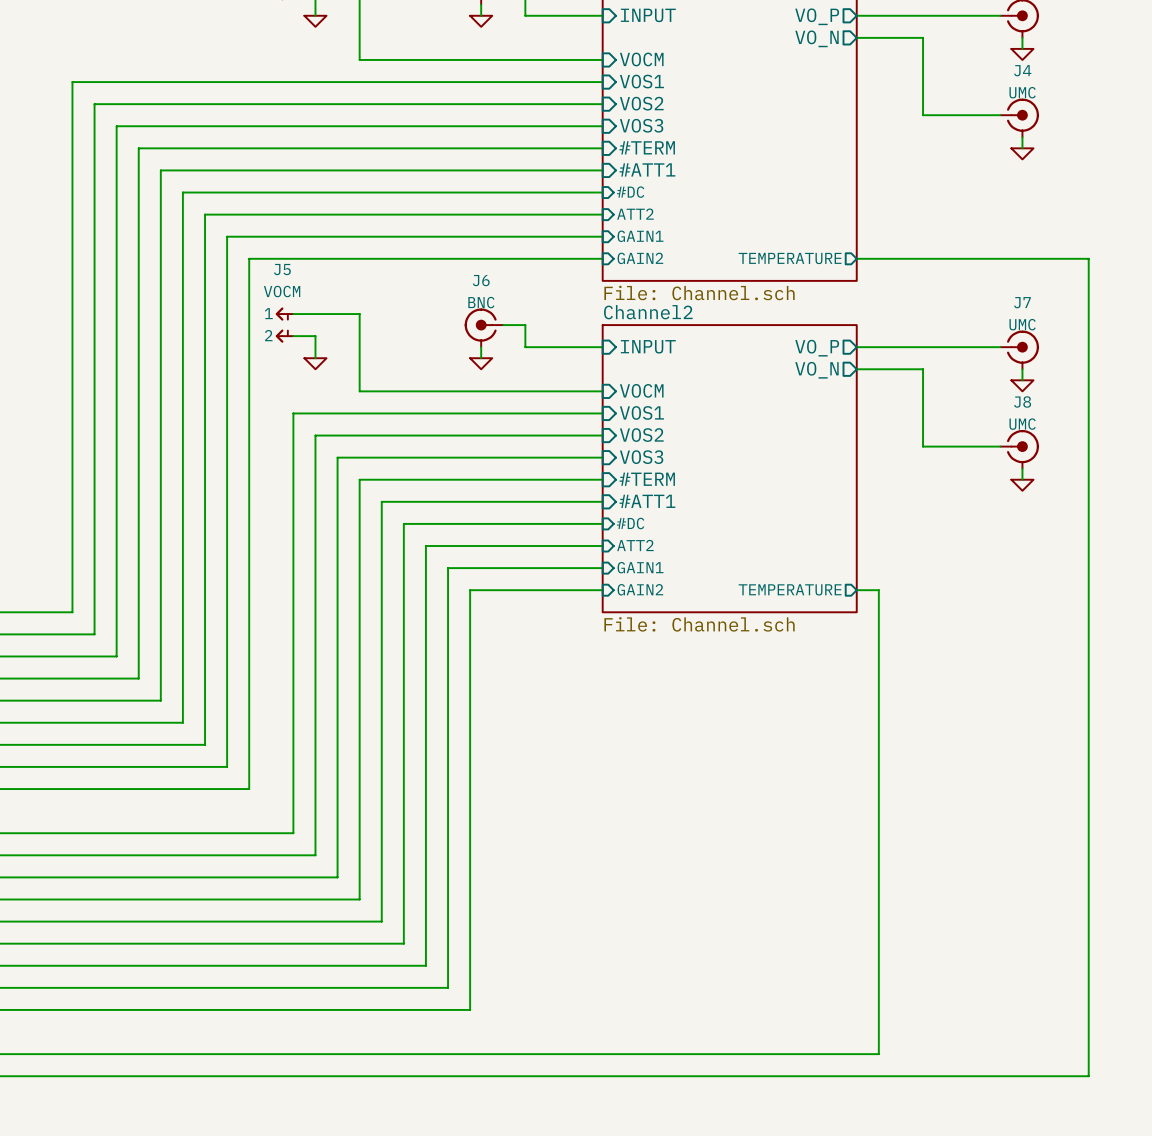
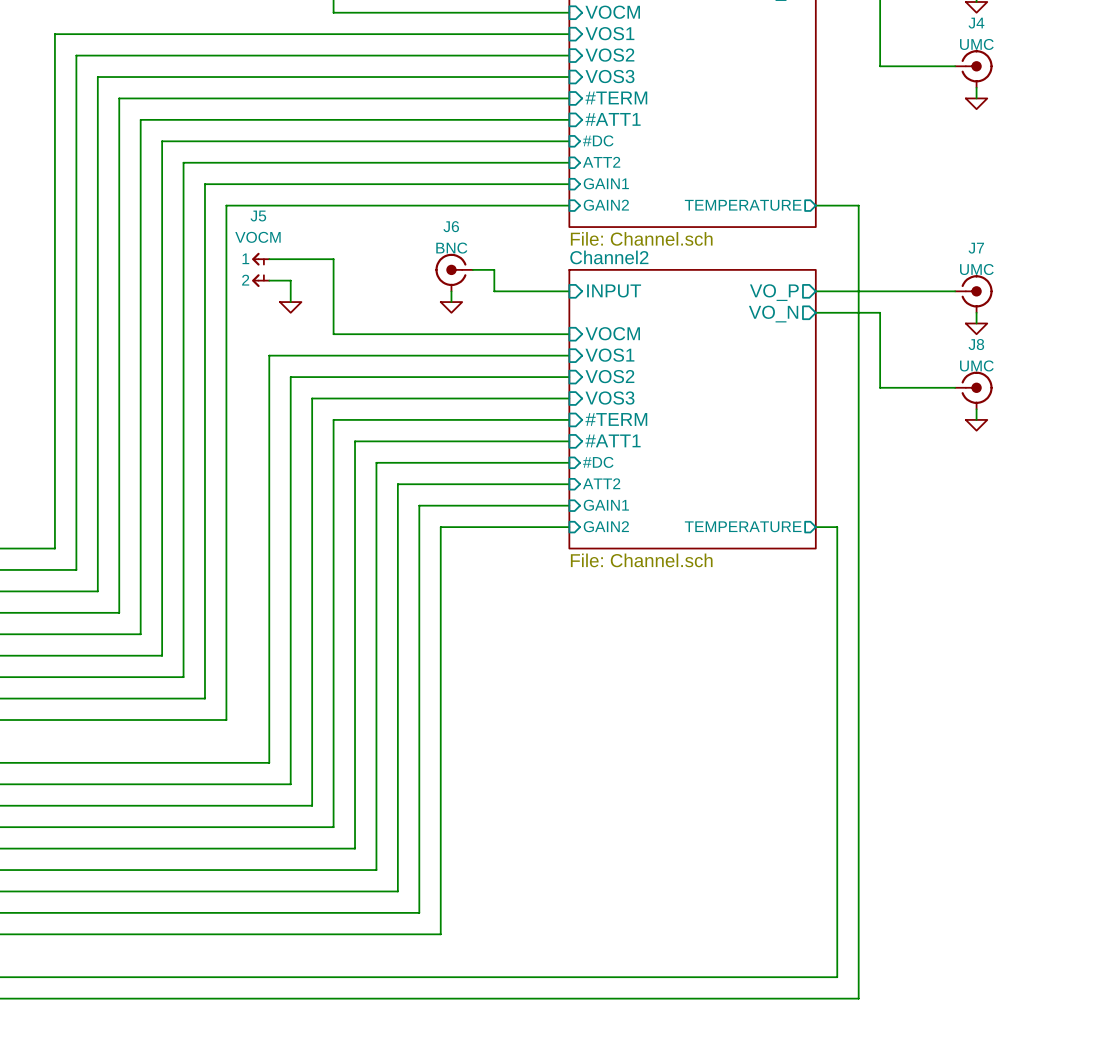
wire: (900, 258) (1088, 258) (1088, 1076) (900, 1076) -> (858, 205) (858, 998)

